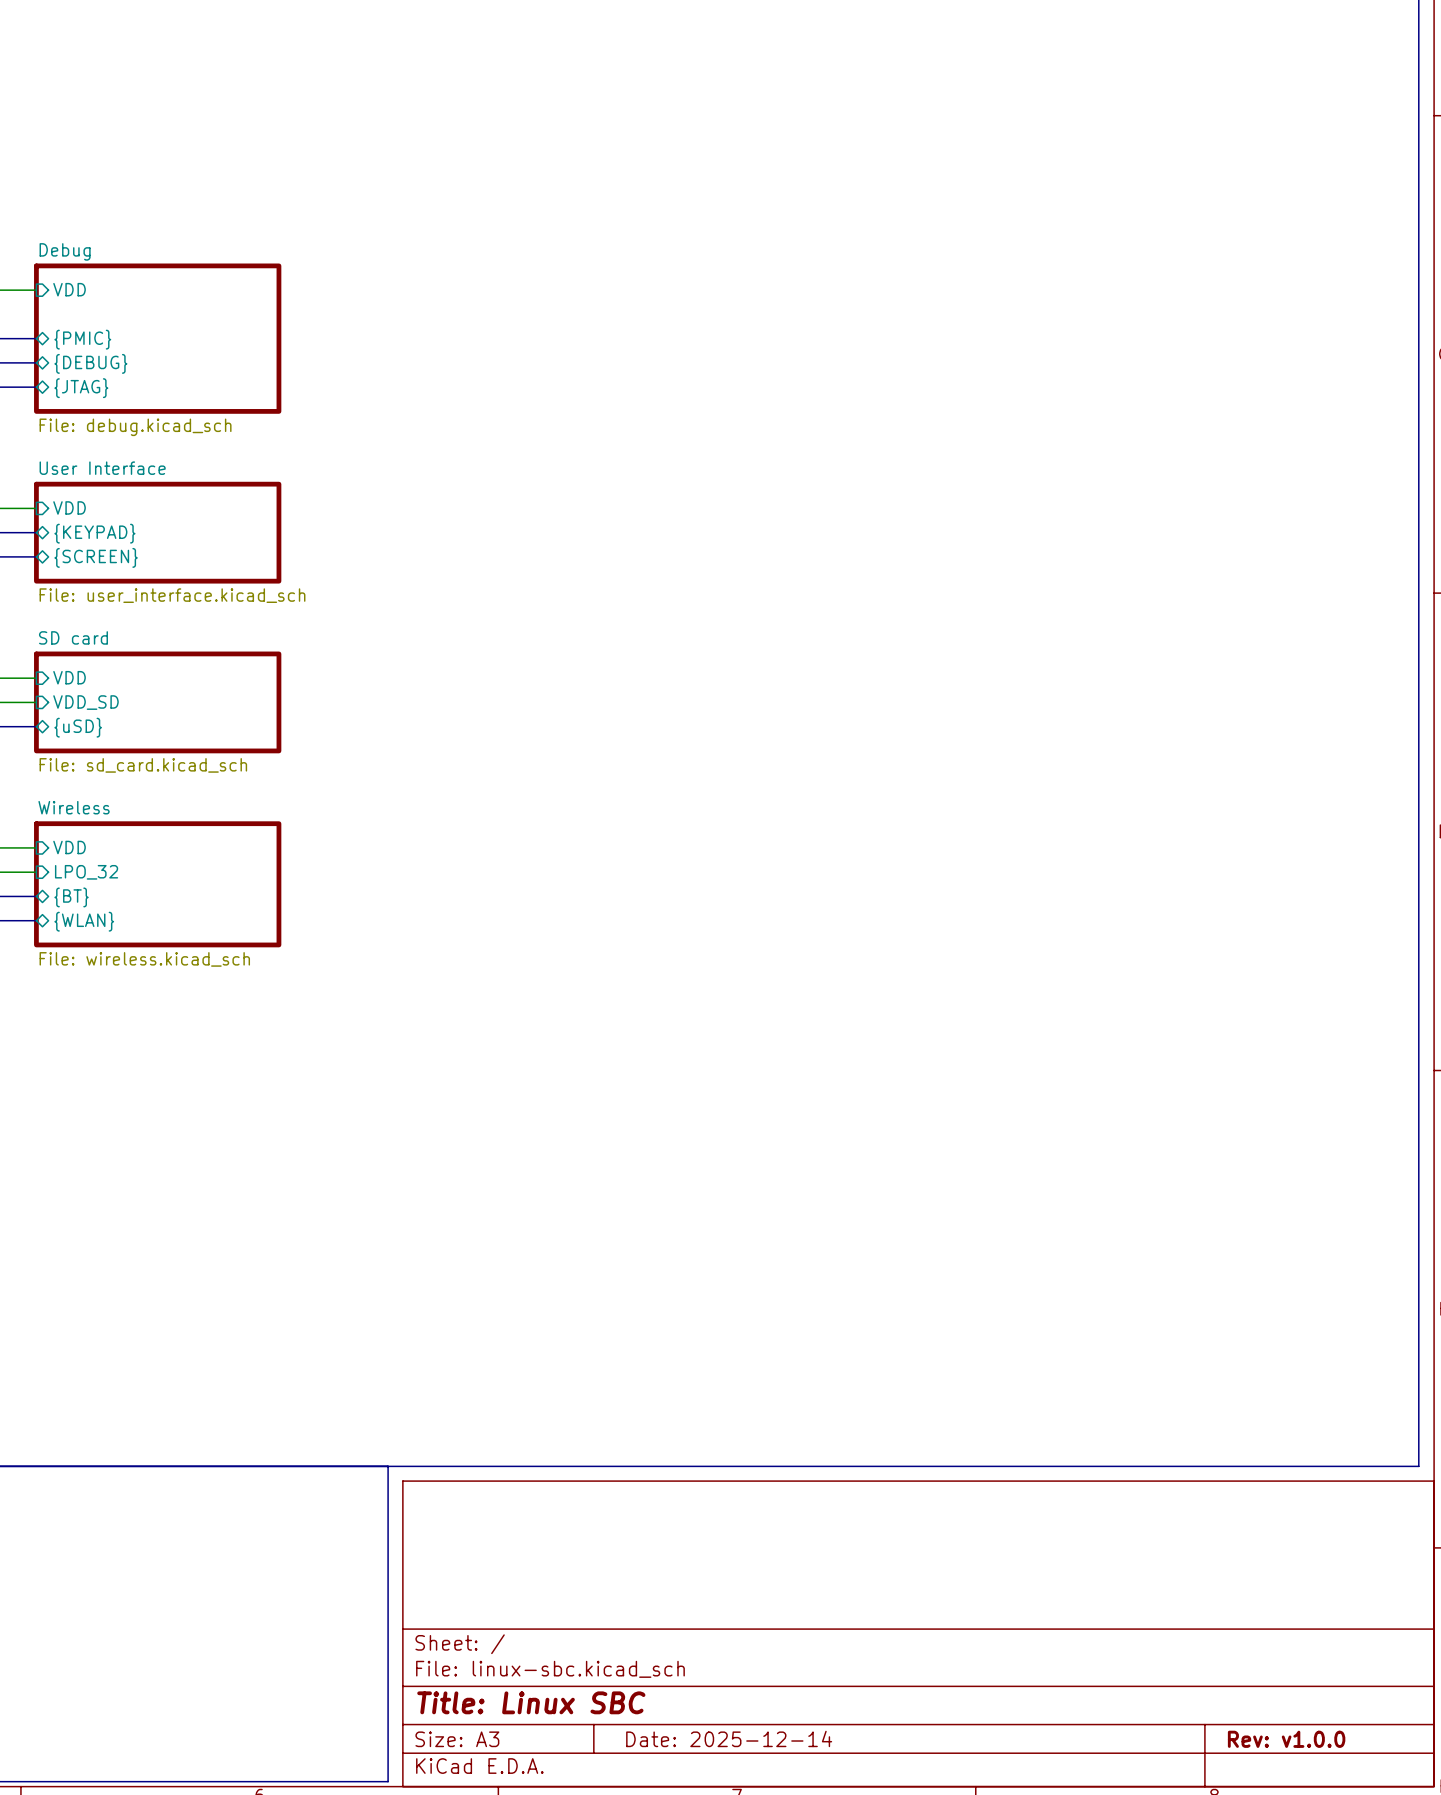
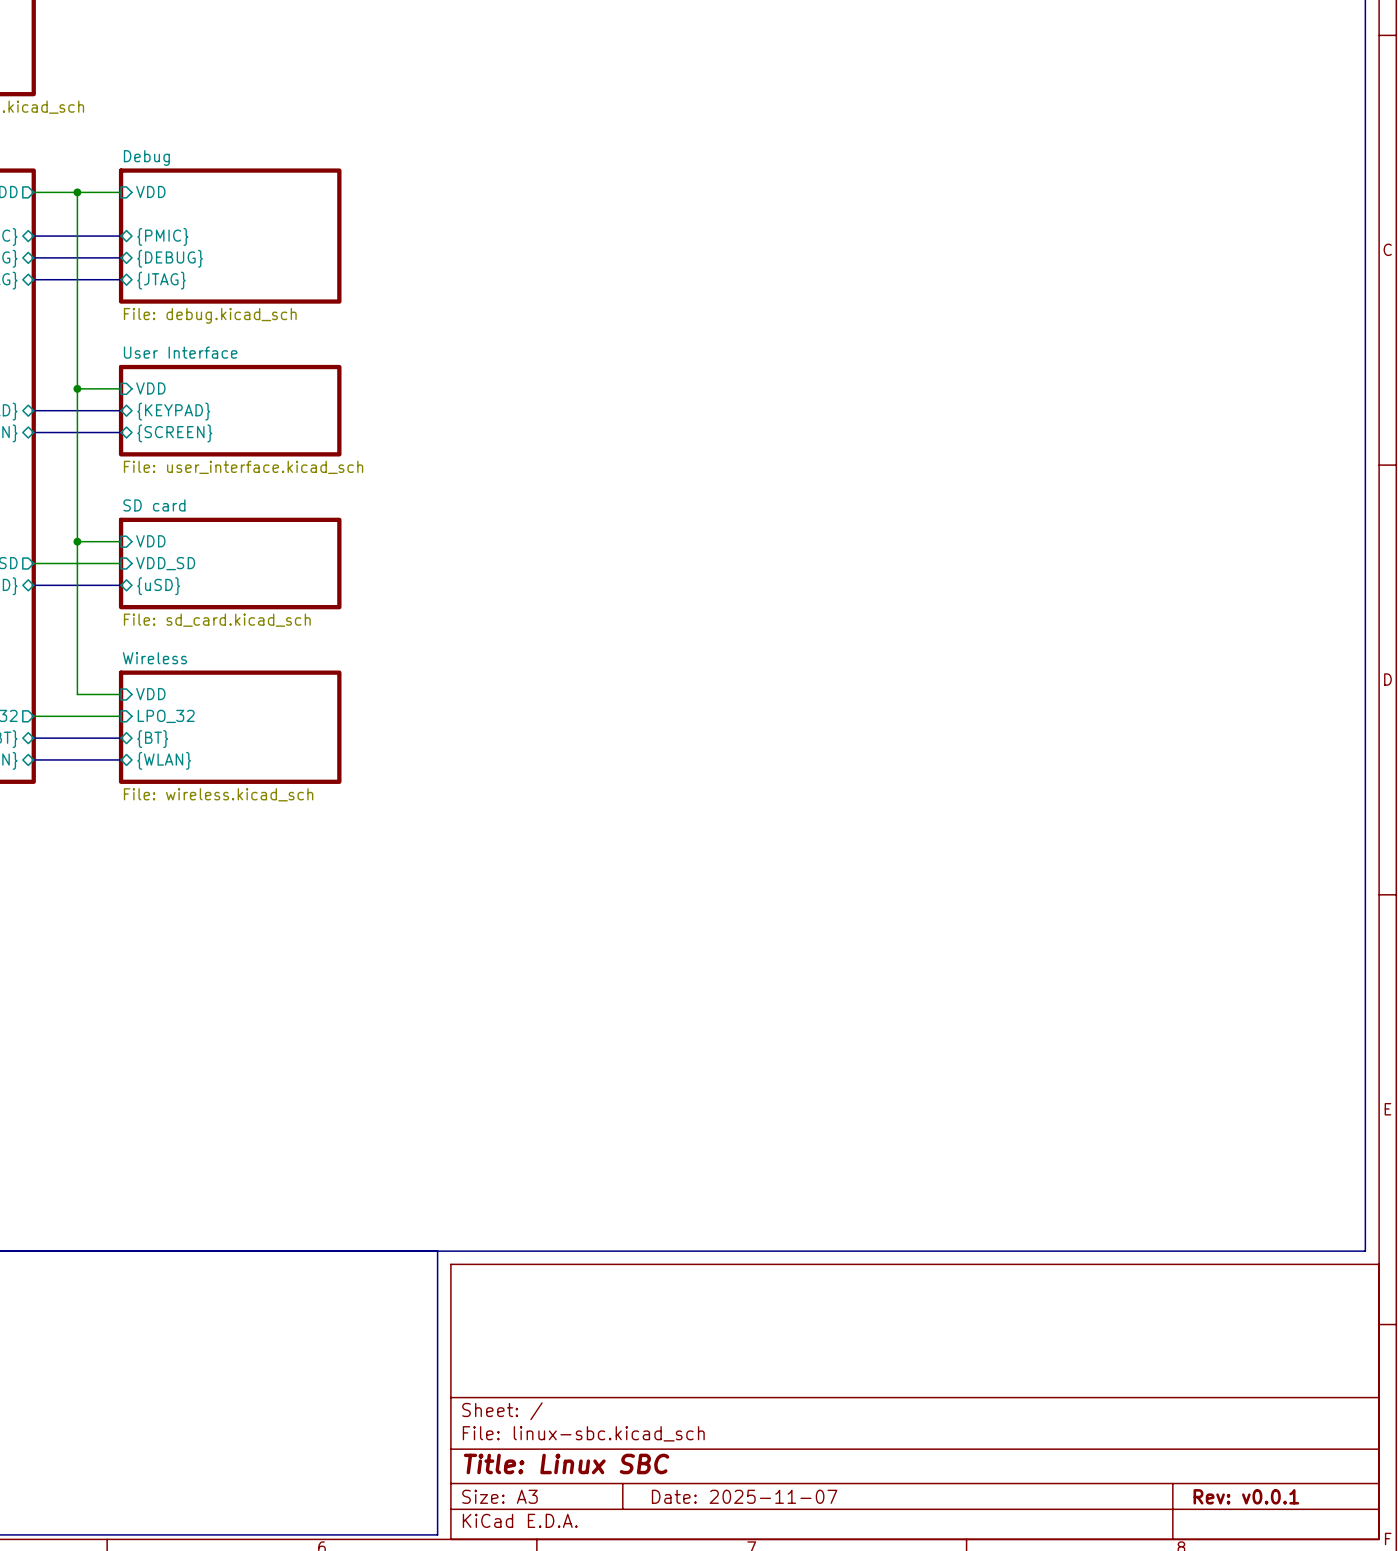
title block: Date: 2025-12-14 (729, 1738) -> Date: 2025-11-07 (744, 1496)
title block: Rev: v1.0.0 (1286, 1739) -> Rev: v0.0.1 (1246, 1496)

